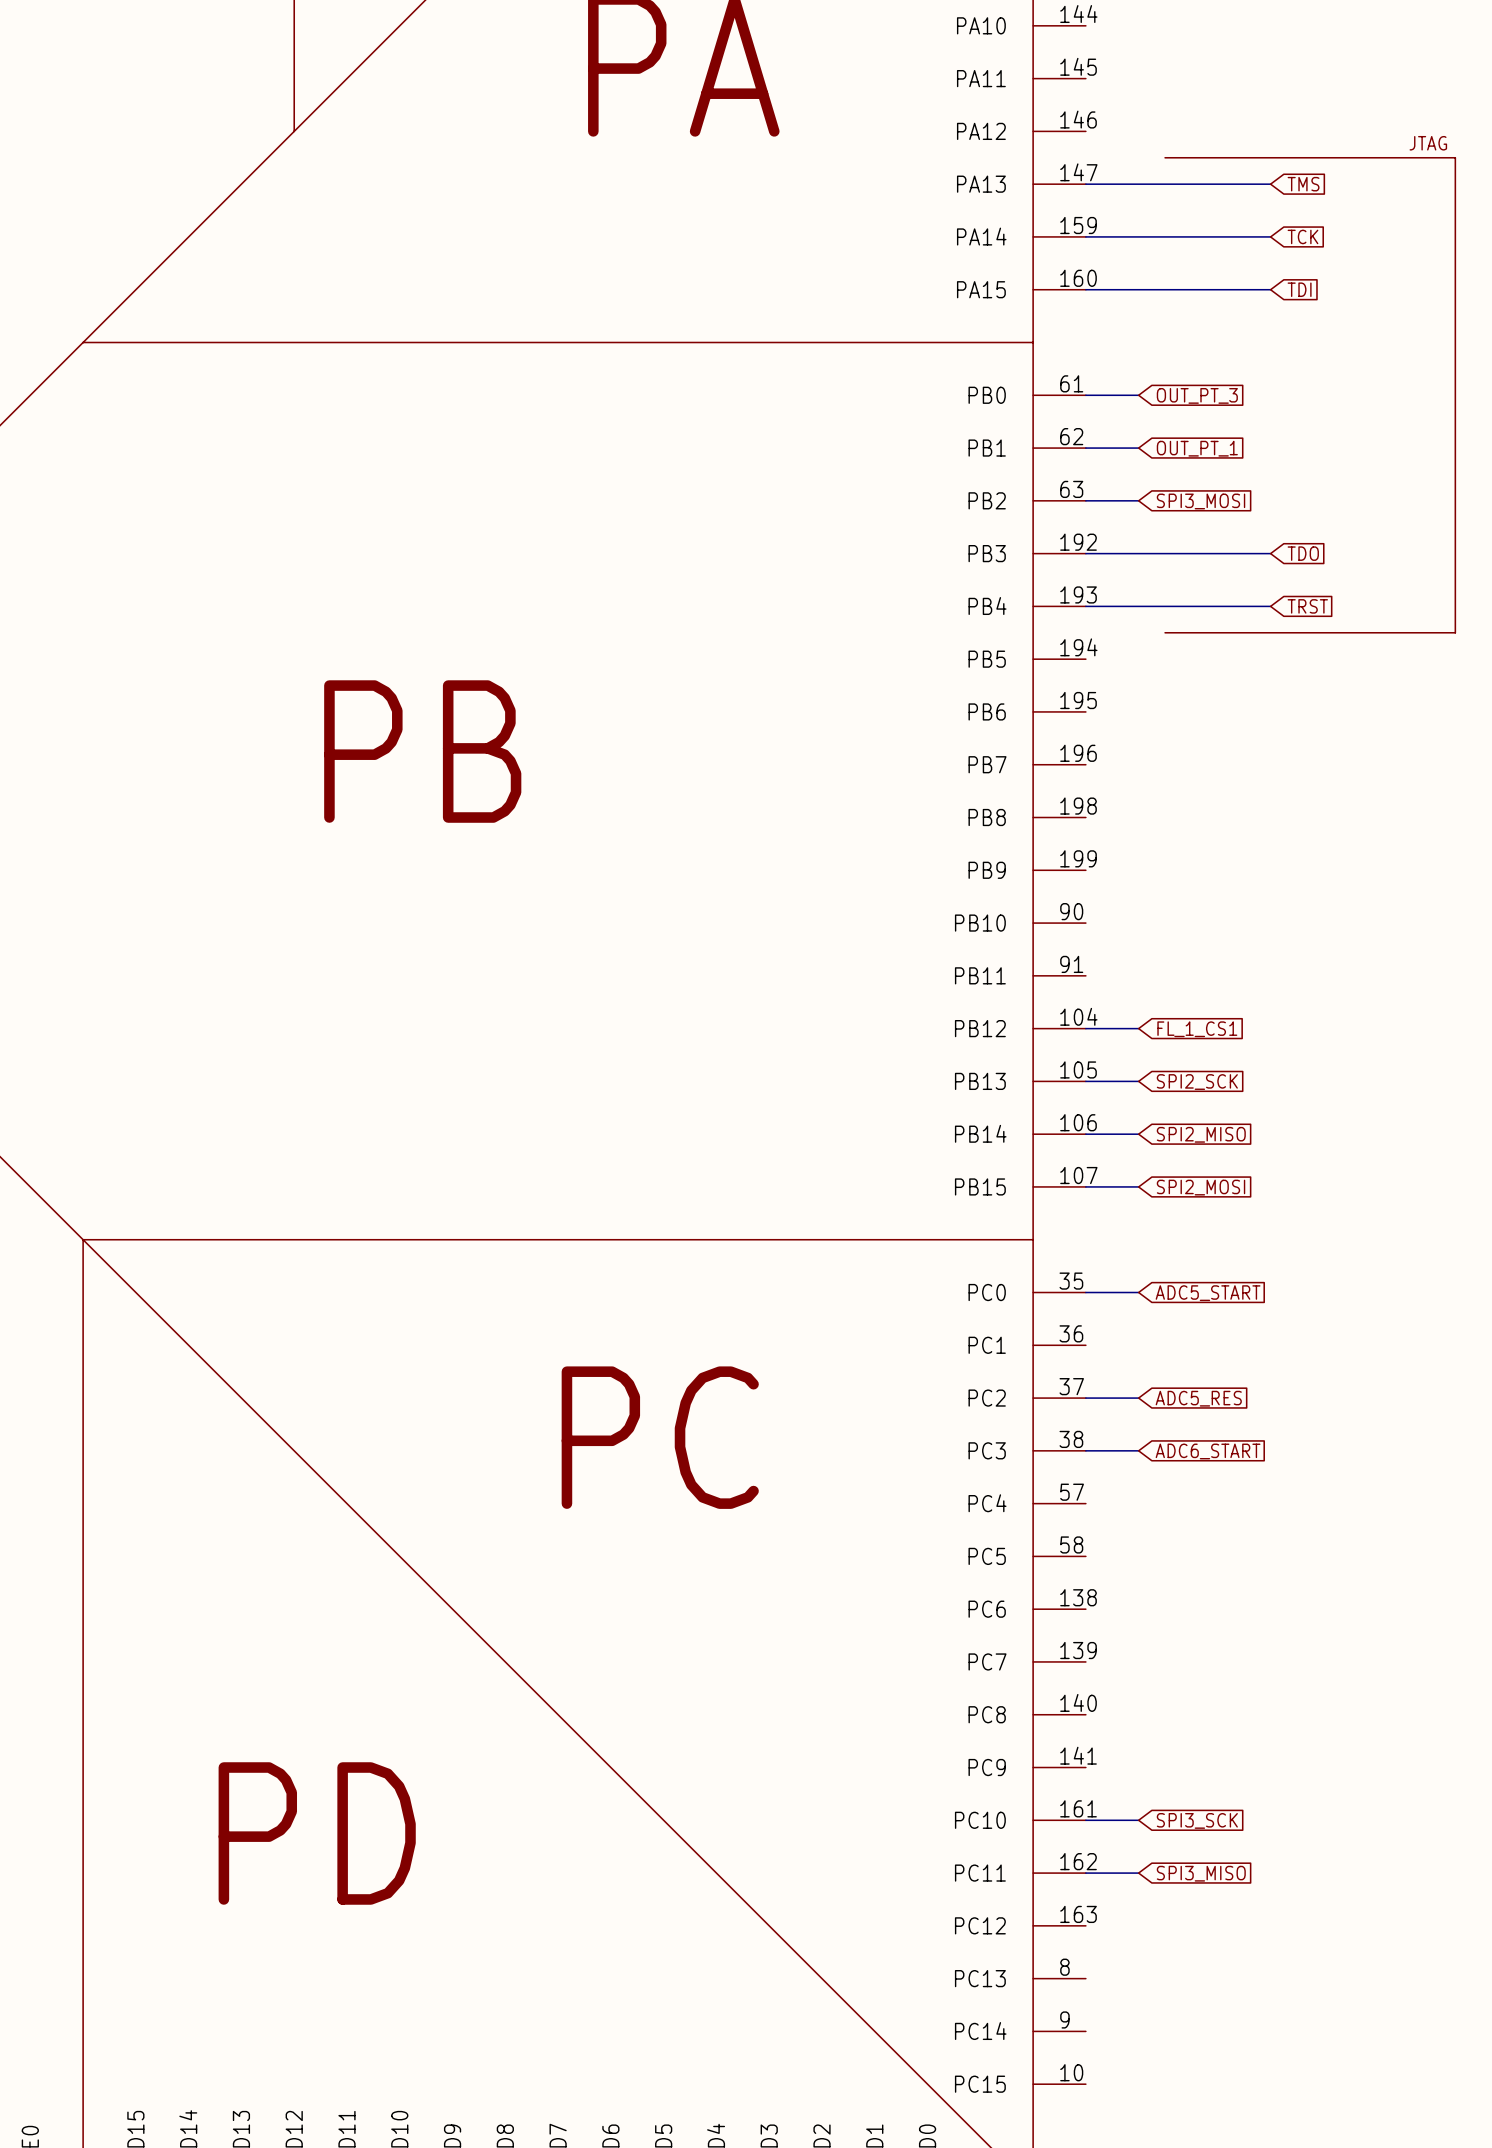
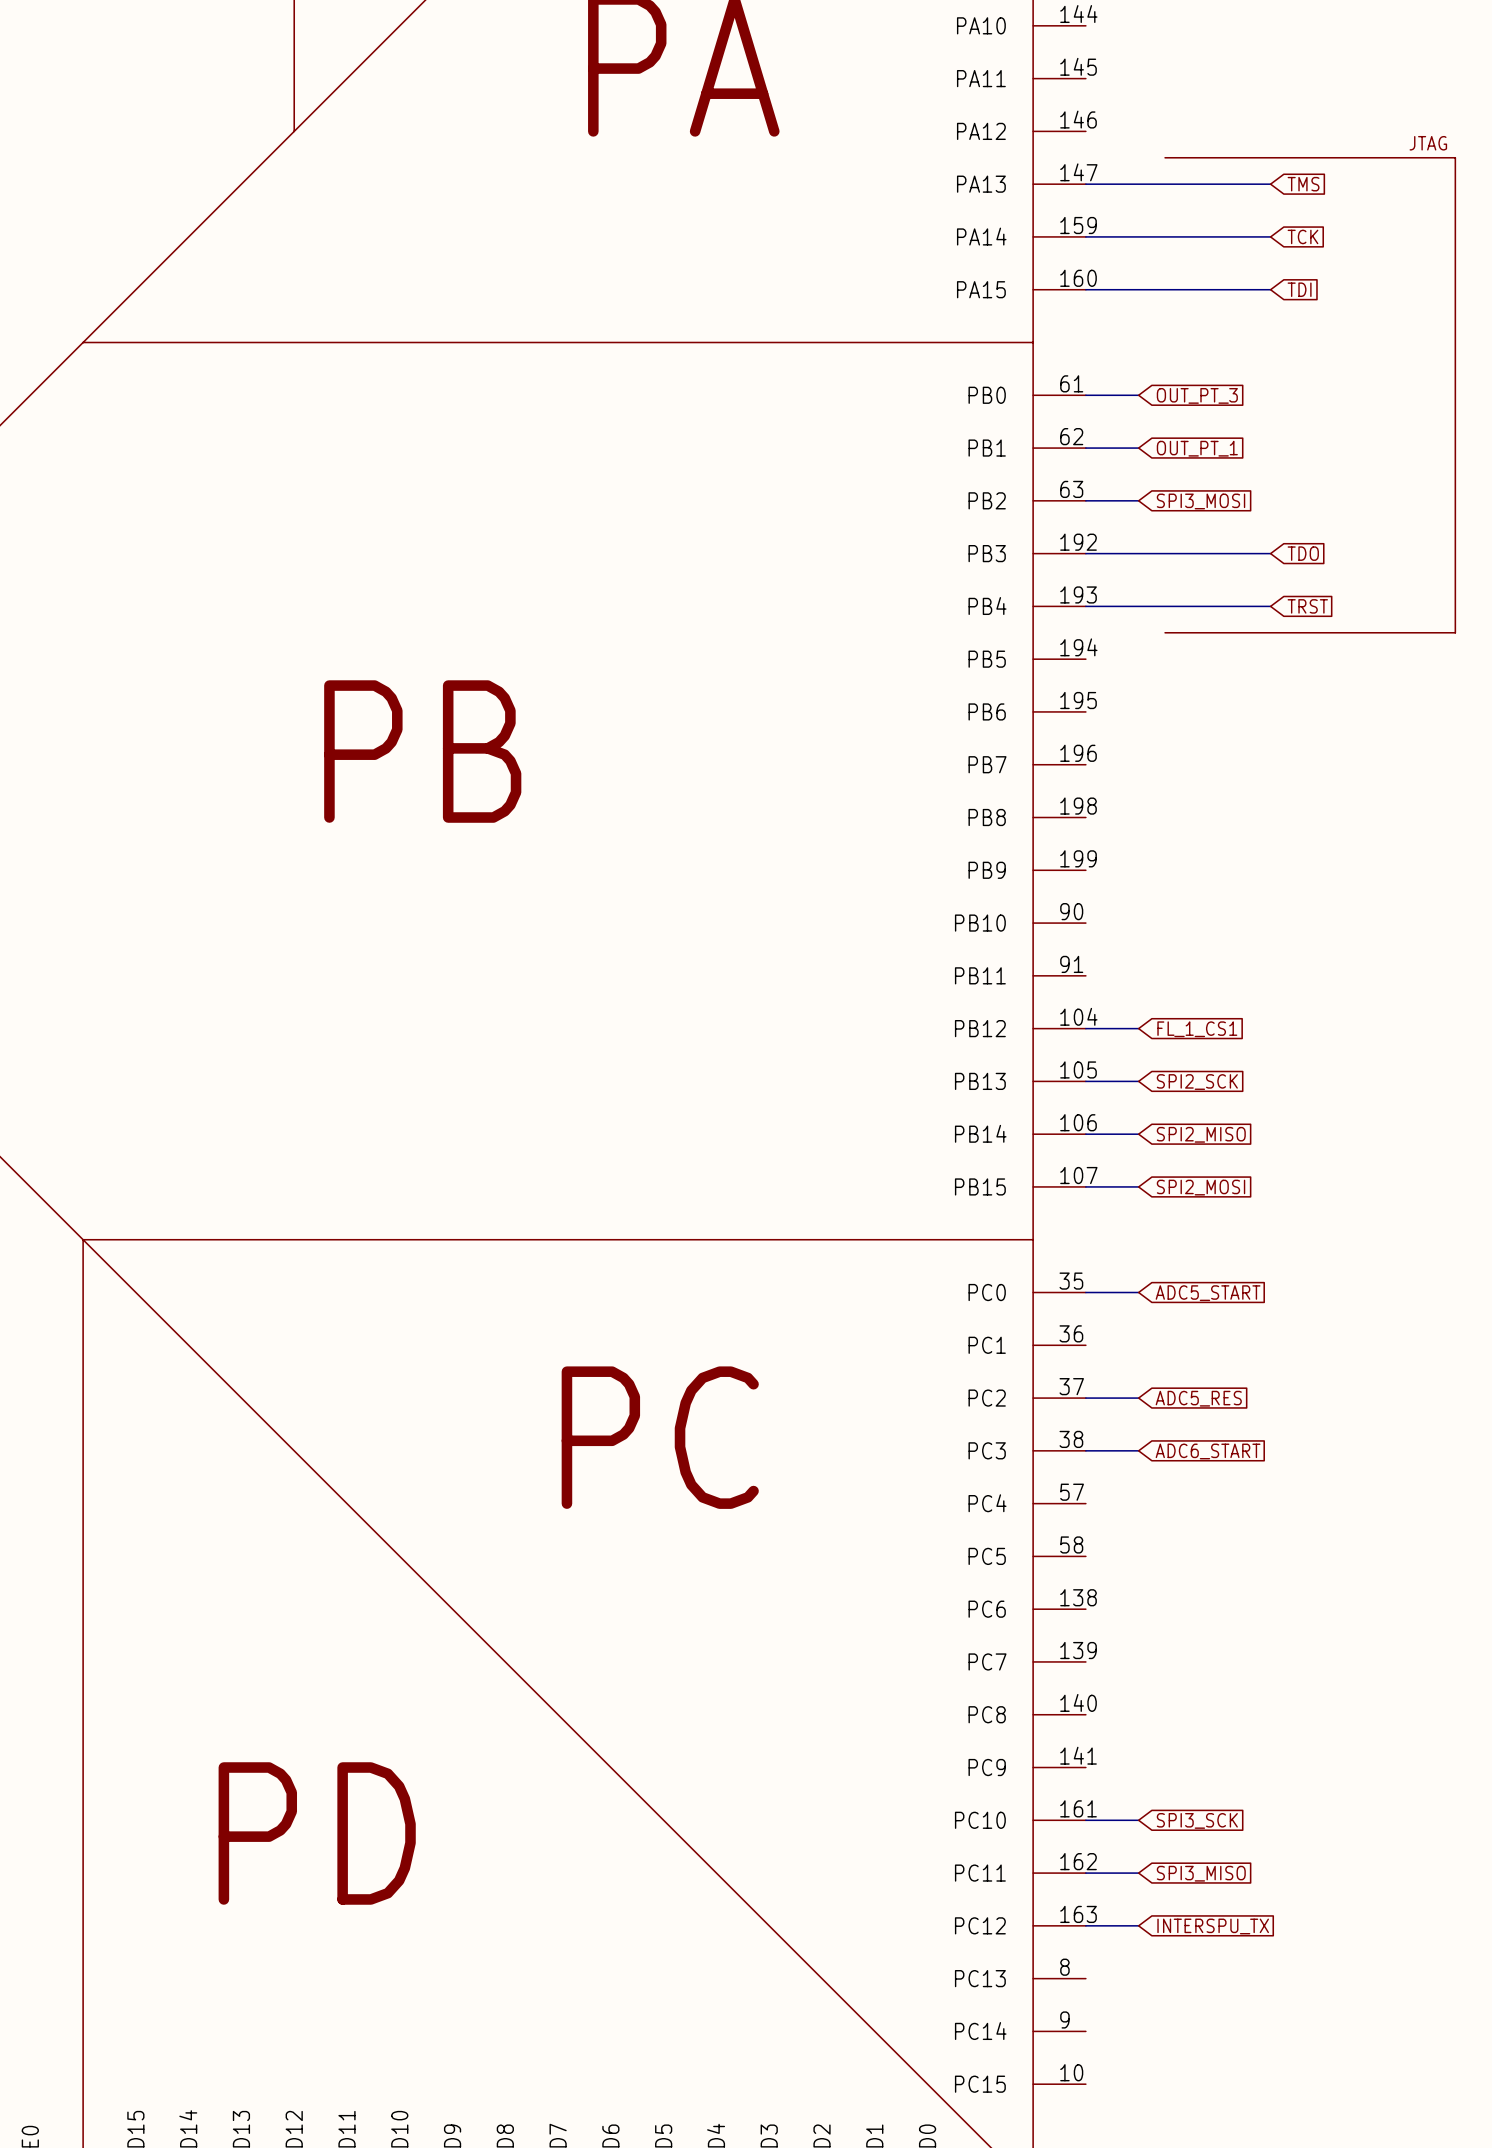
wire: none -> (1085, 1925) (1138, 1925)
global label: none -> INTERSPU_TX (1213, 1926)

